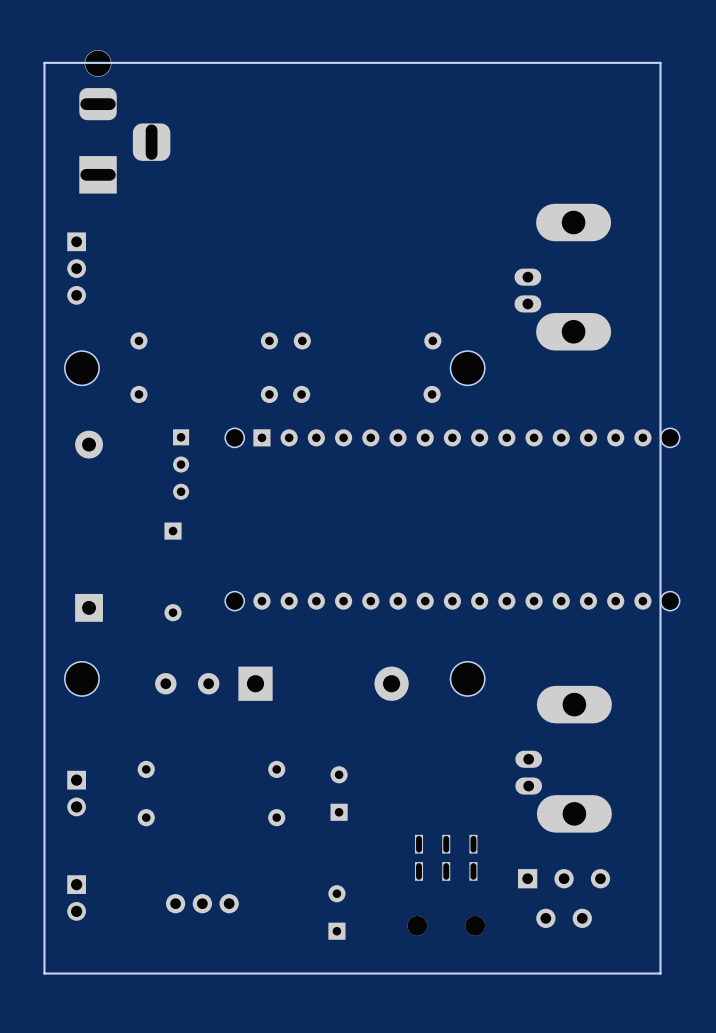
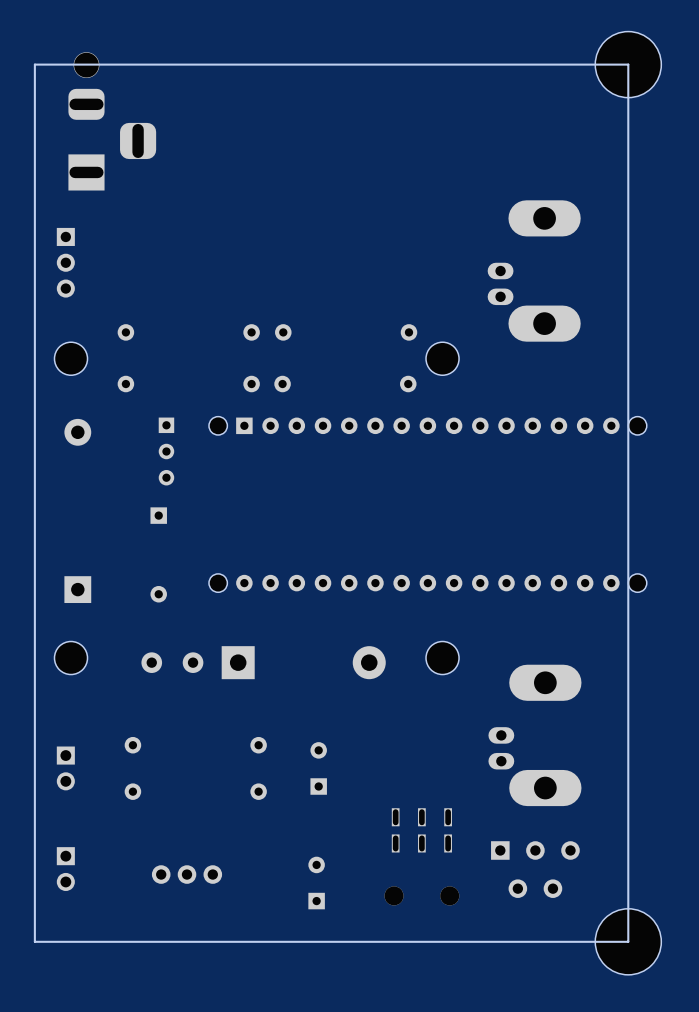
part: none -> (628, 64)
part: none -> (628, 941)

